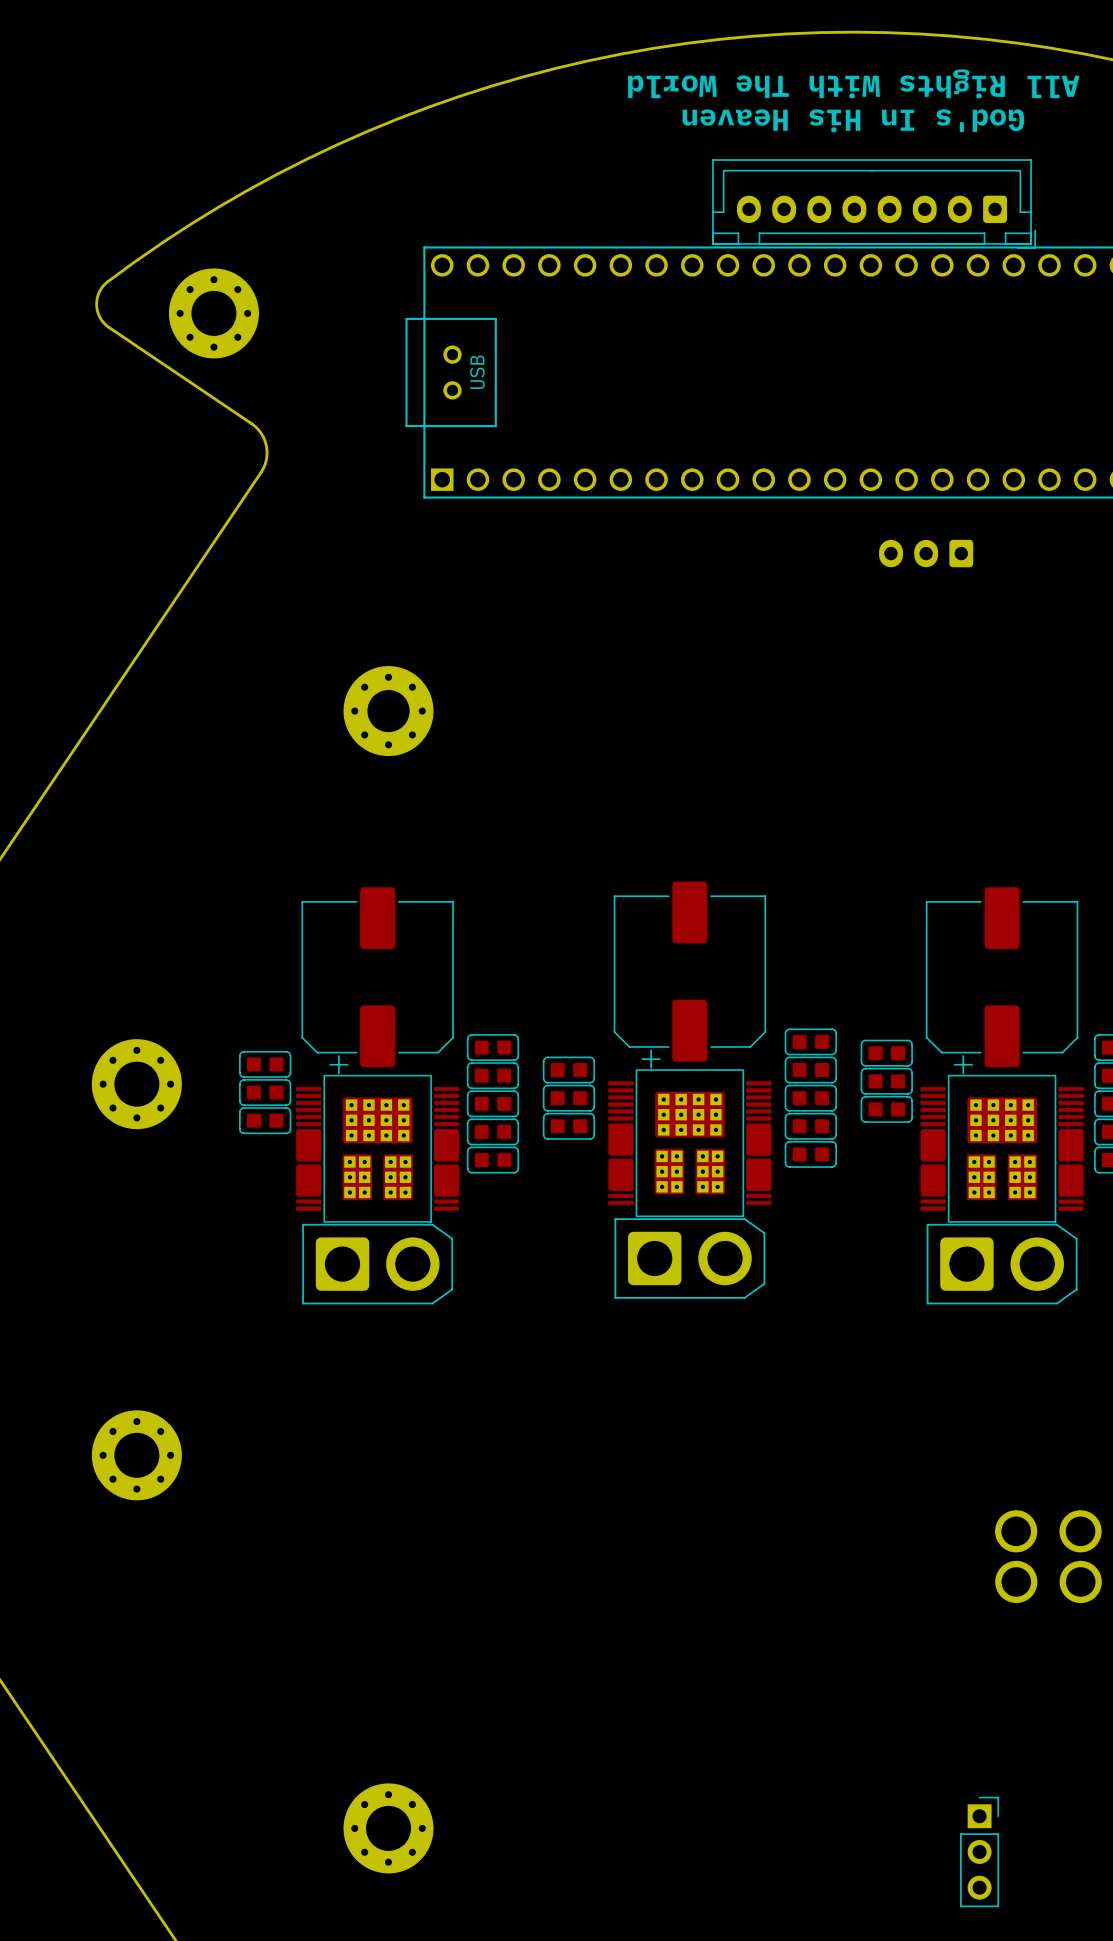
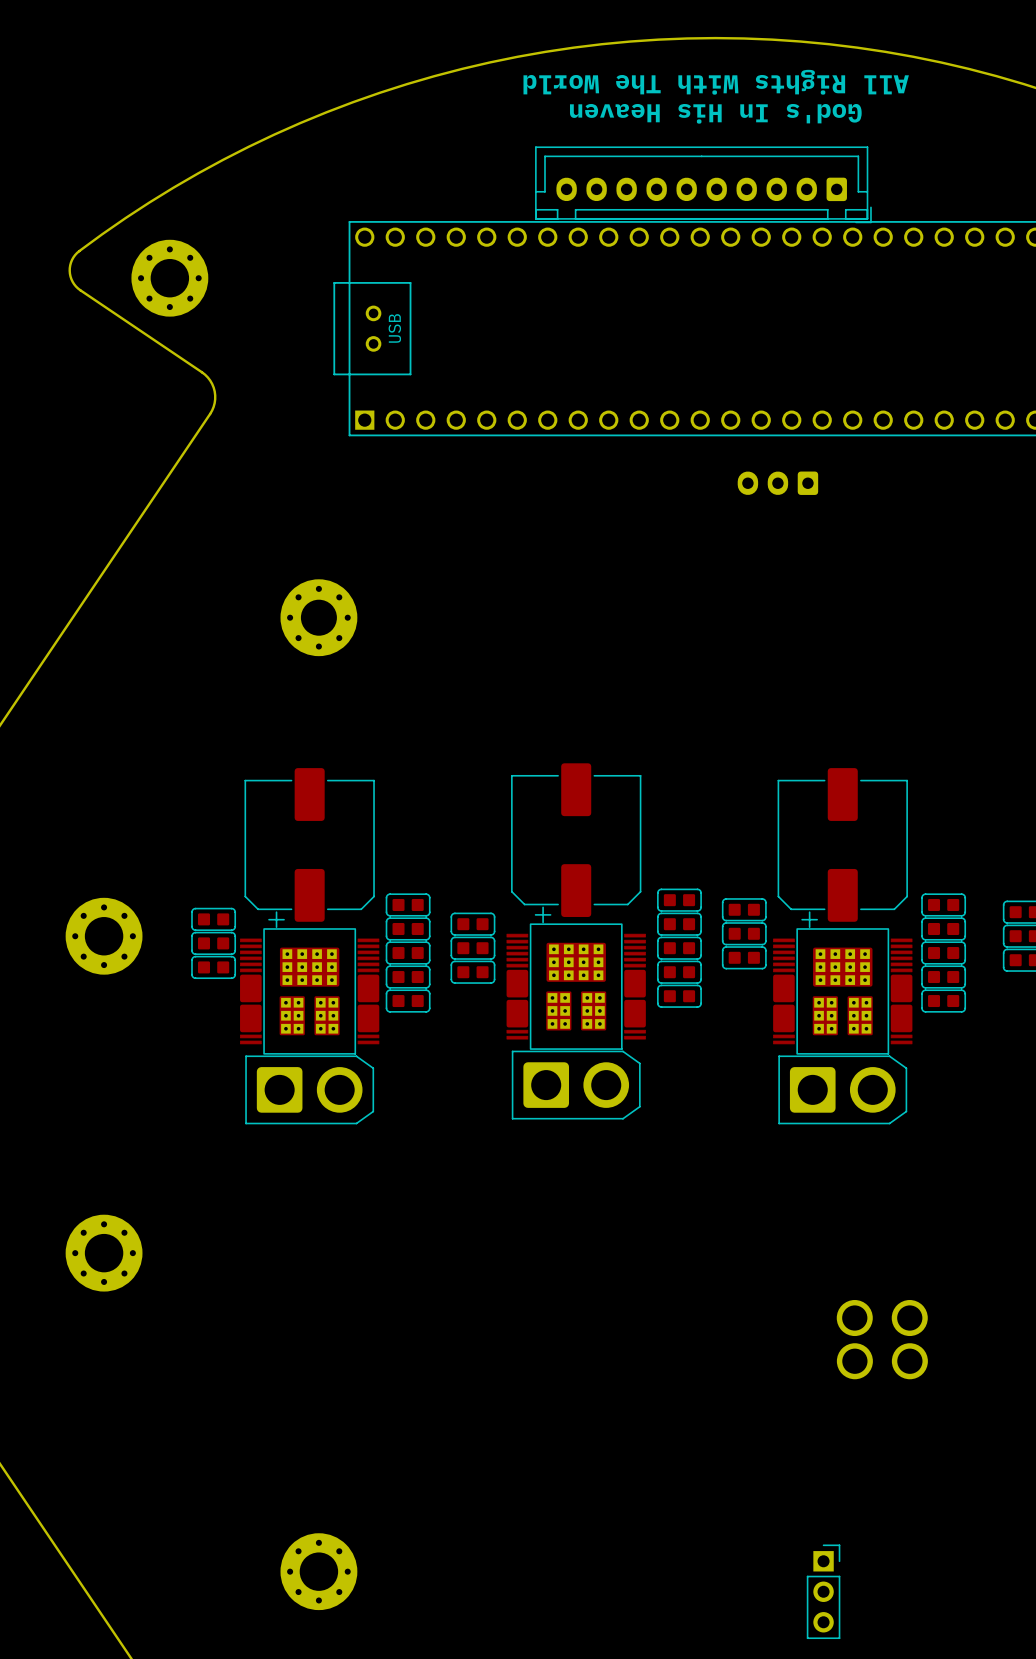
part: none -> (703, 184)
part: (874, 204) -> none

